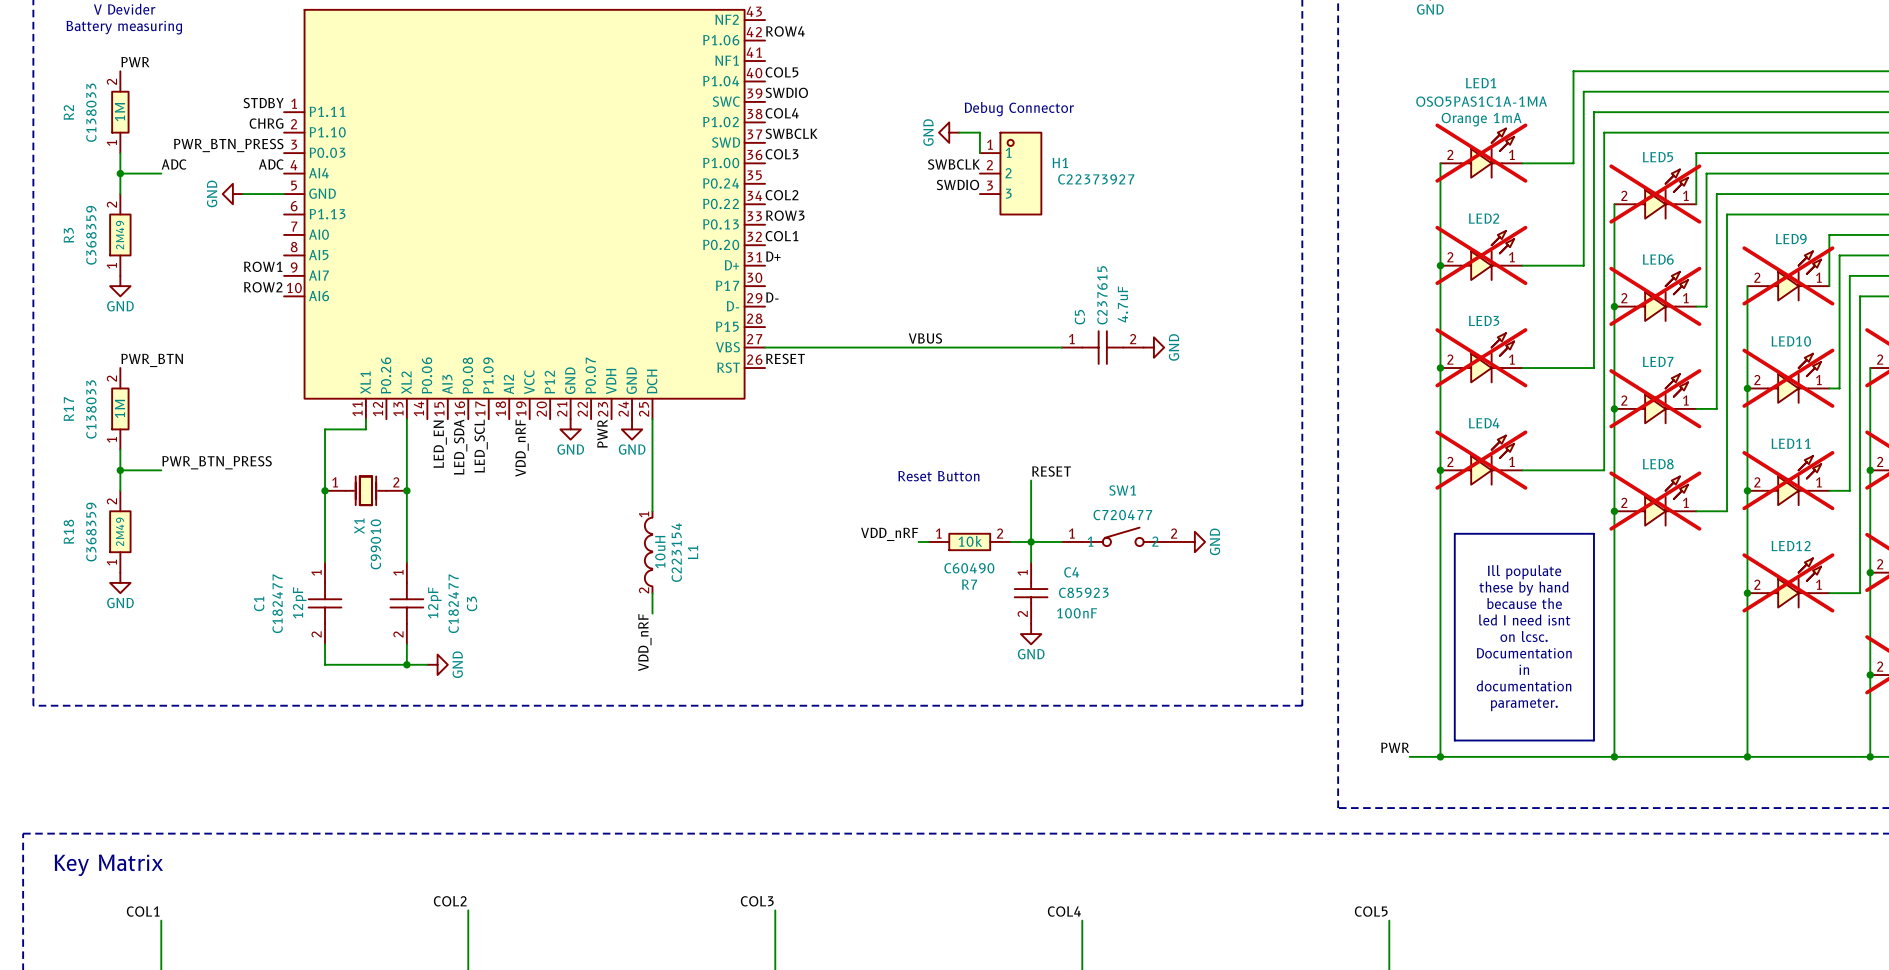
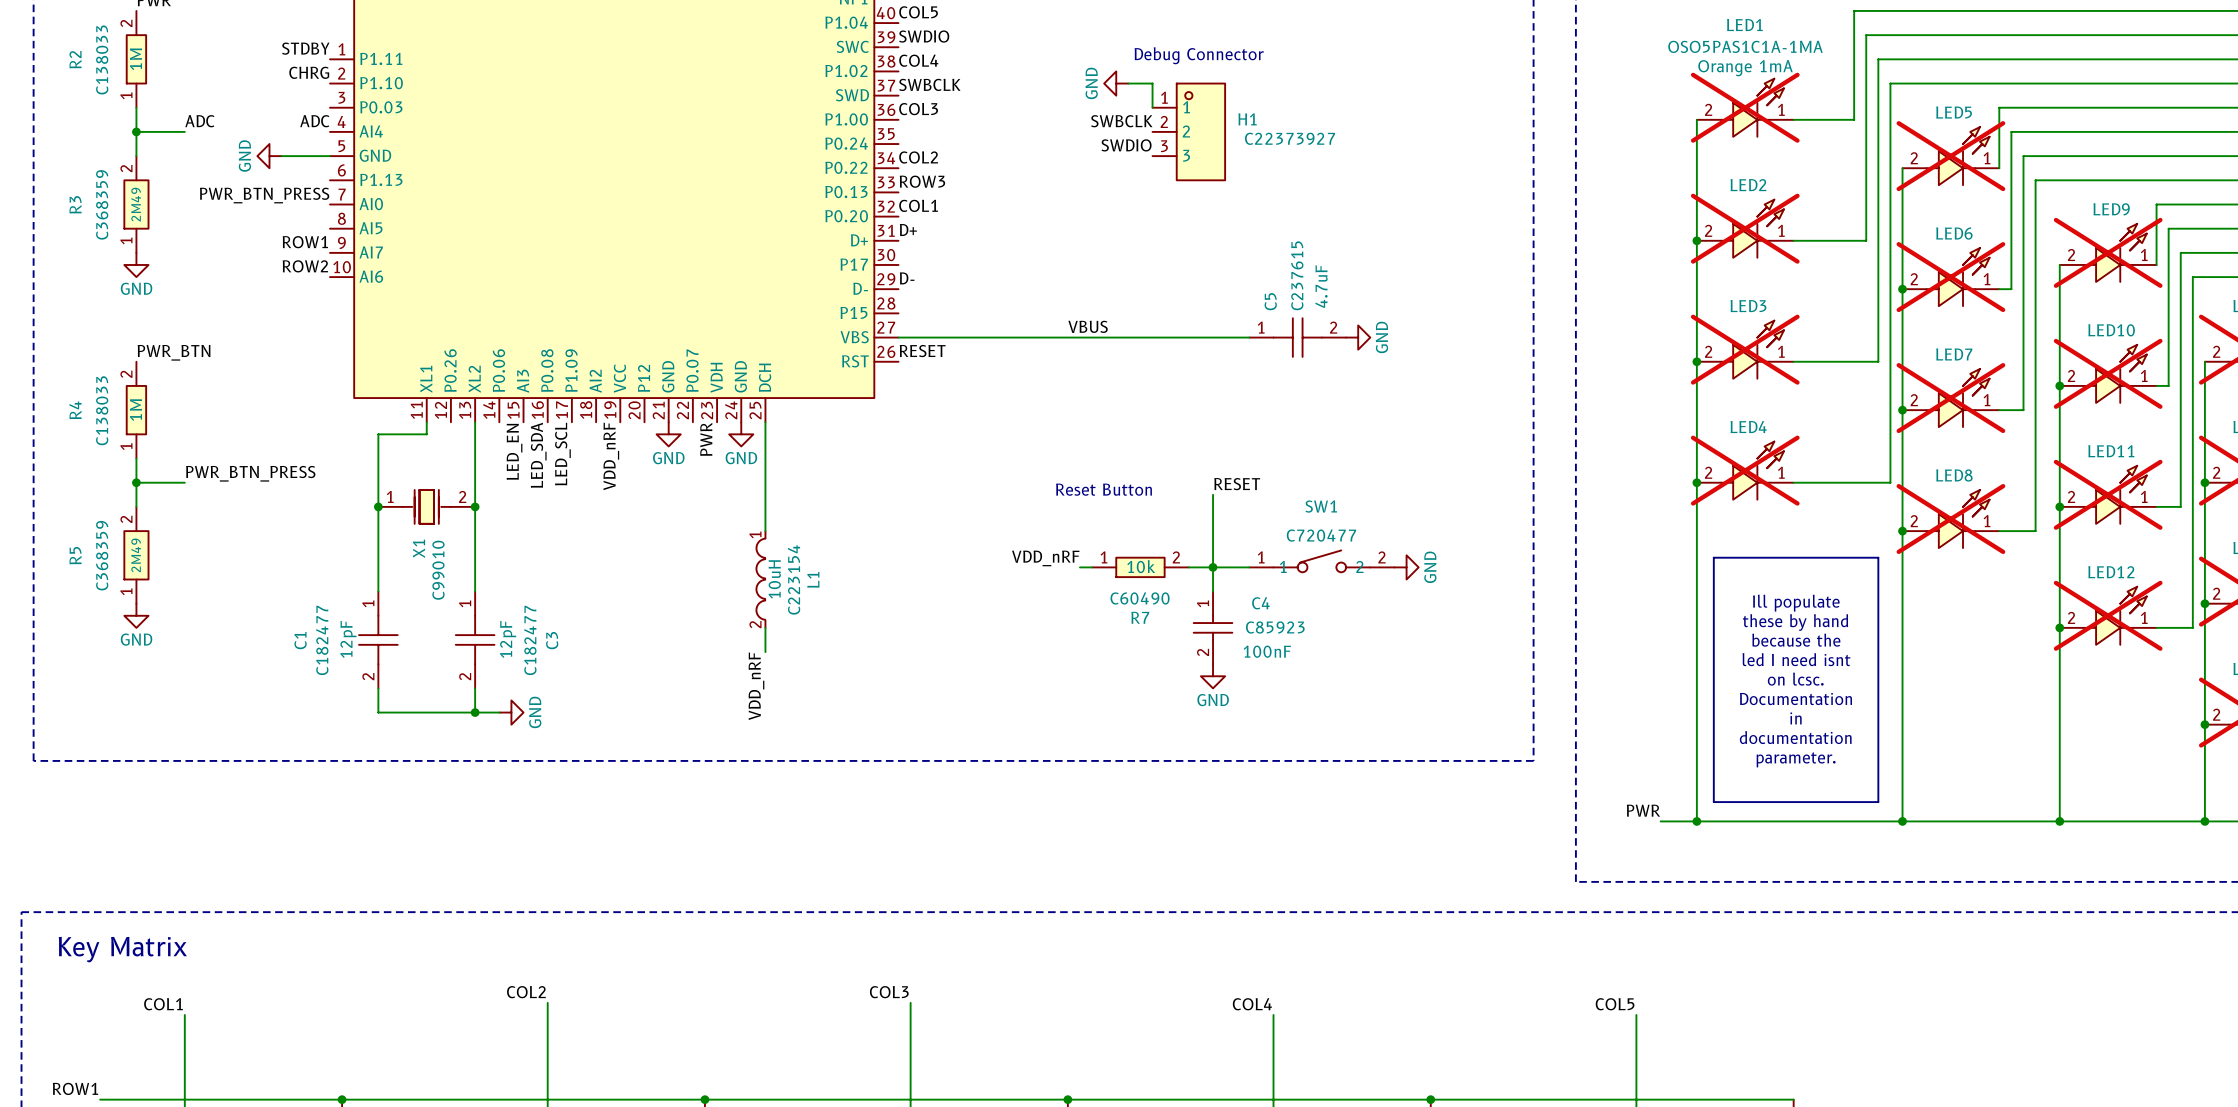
label position: PWR_BTN_PRESS (228, 145) -> PWR_BTN_PRESS (264, 195)
R17 name: R17 (68, 409) -> R4 (75, 410)
R18 name: R18 (68, 531) -> R5 (75, 555)

